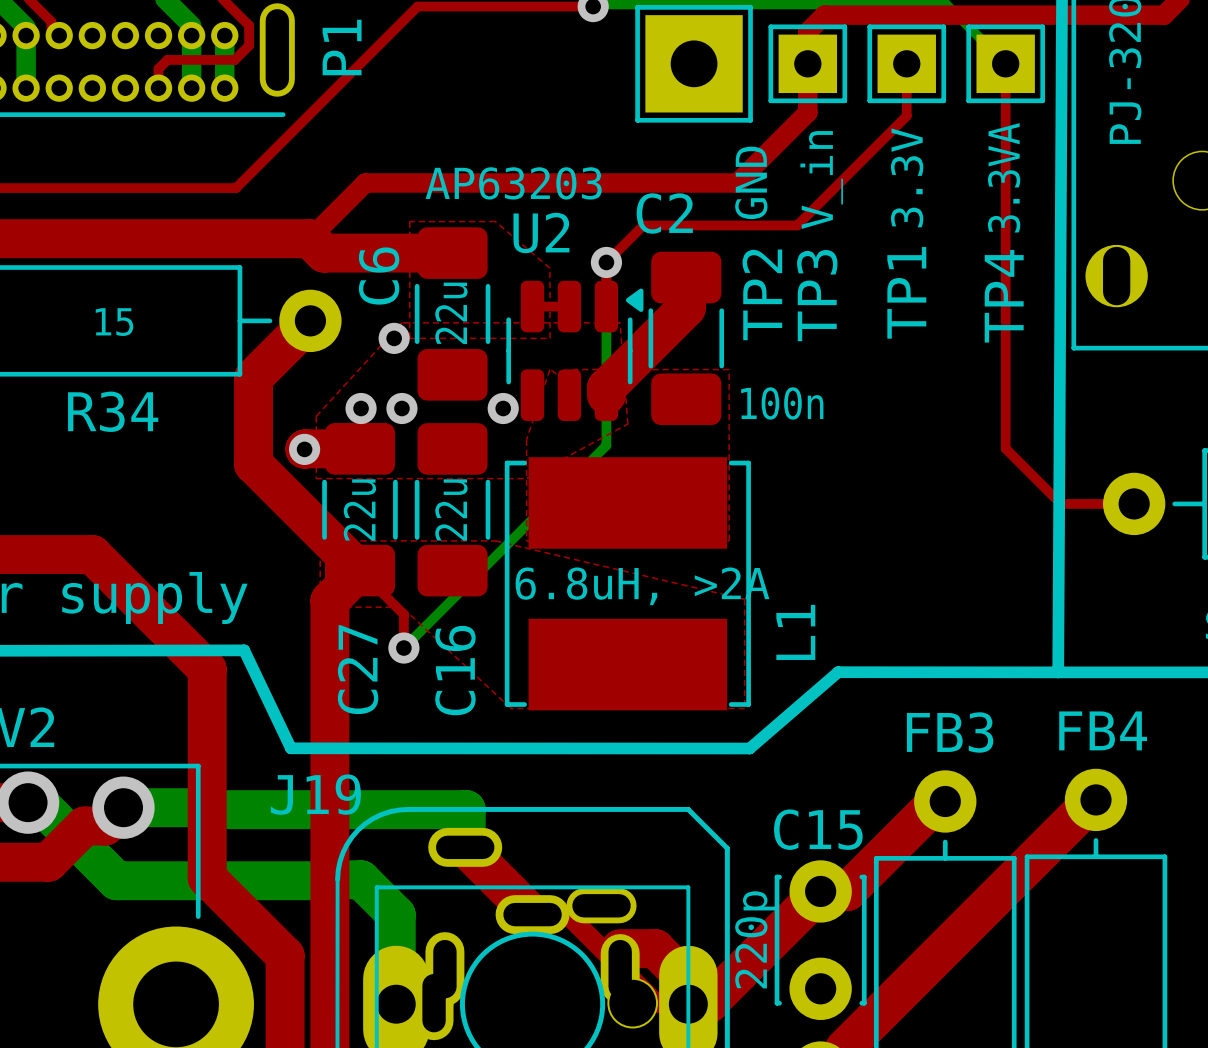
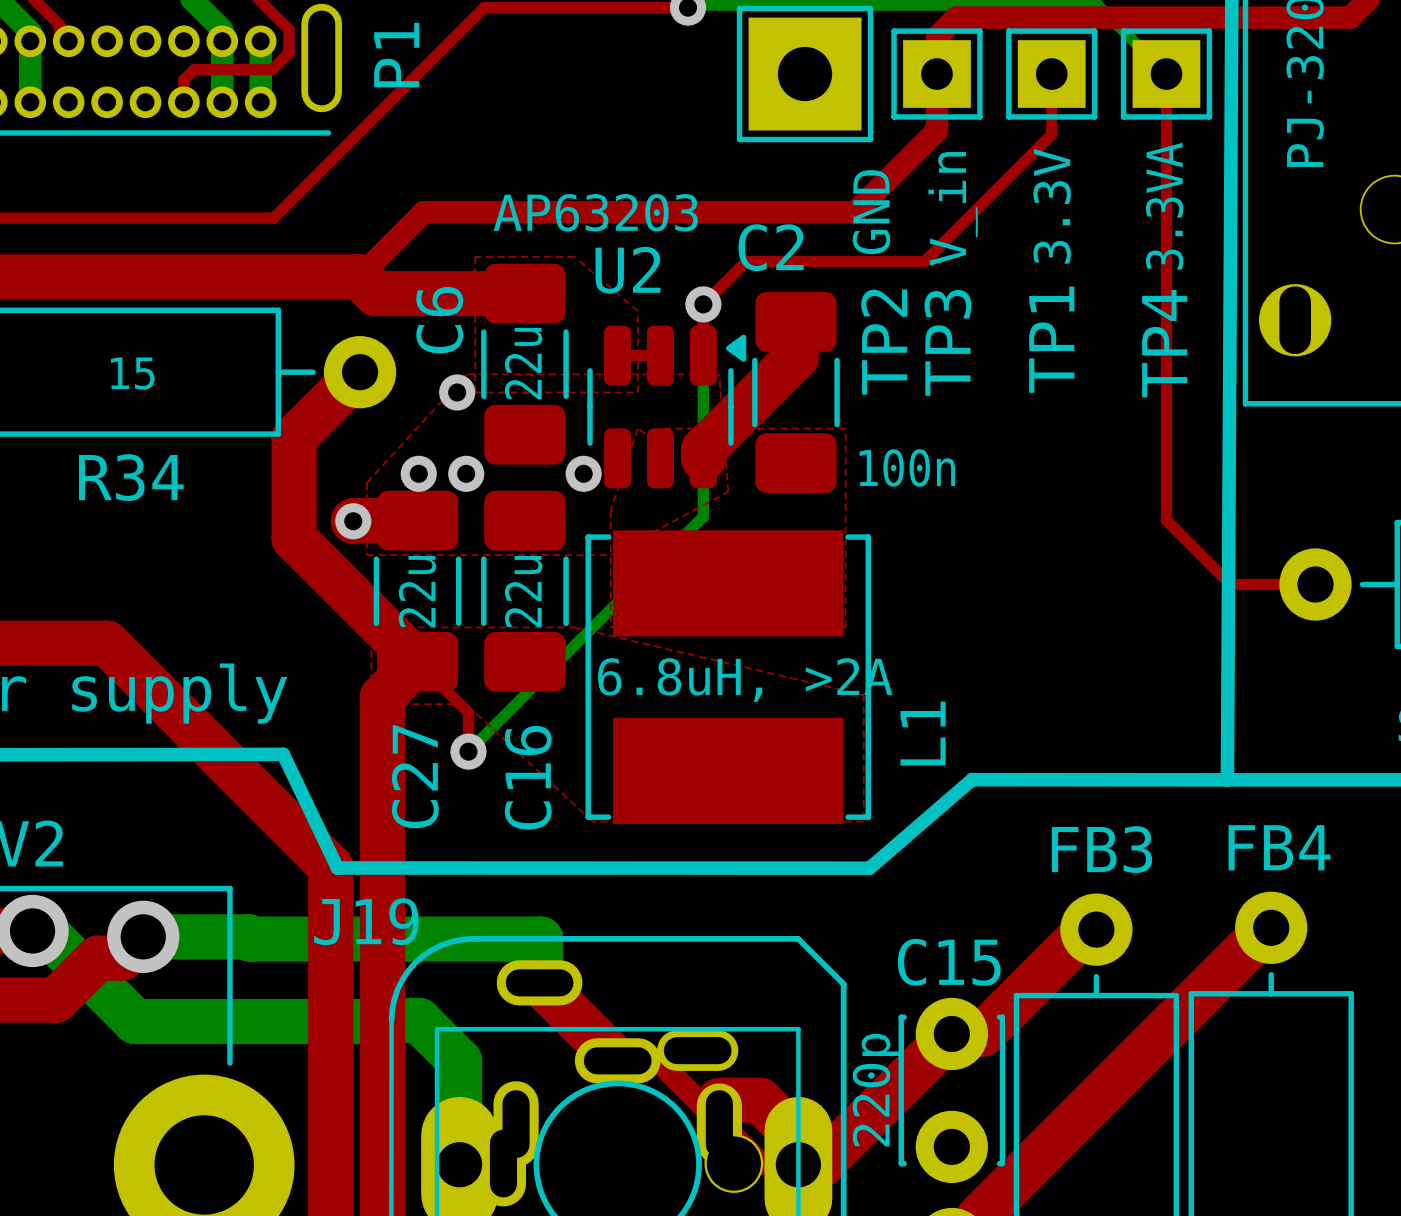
top track: (207, 669) (207, 877) (285, 955) -> (240, 776) (330, 866) (330, 1108)

